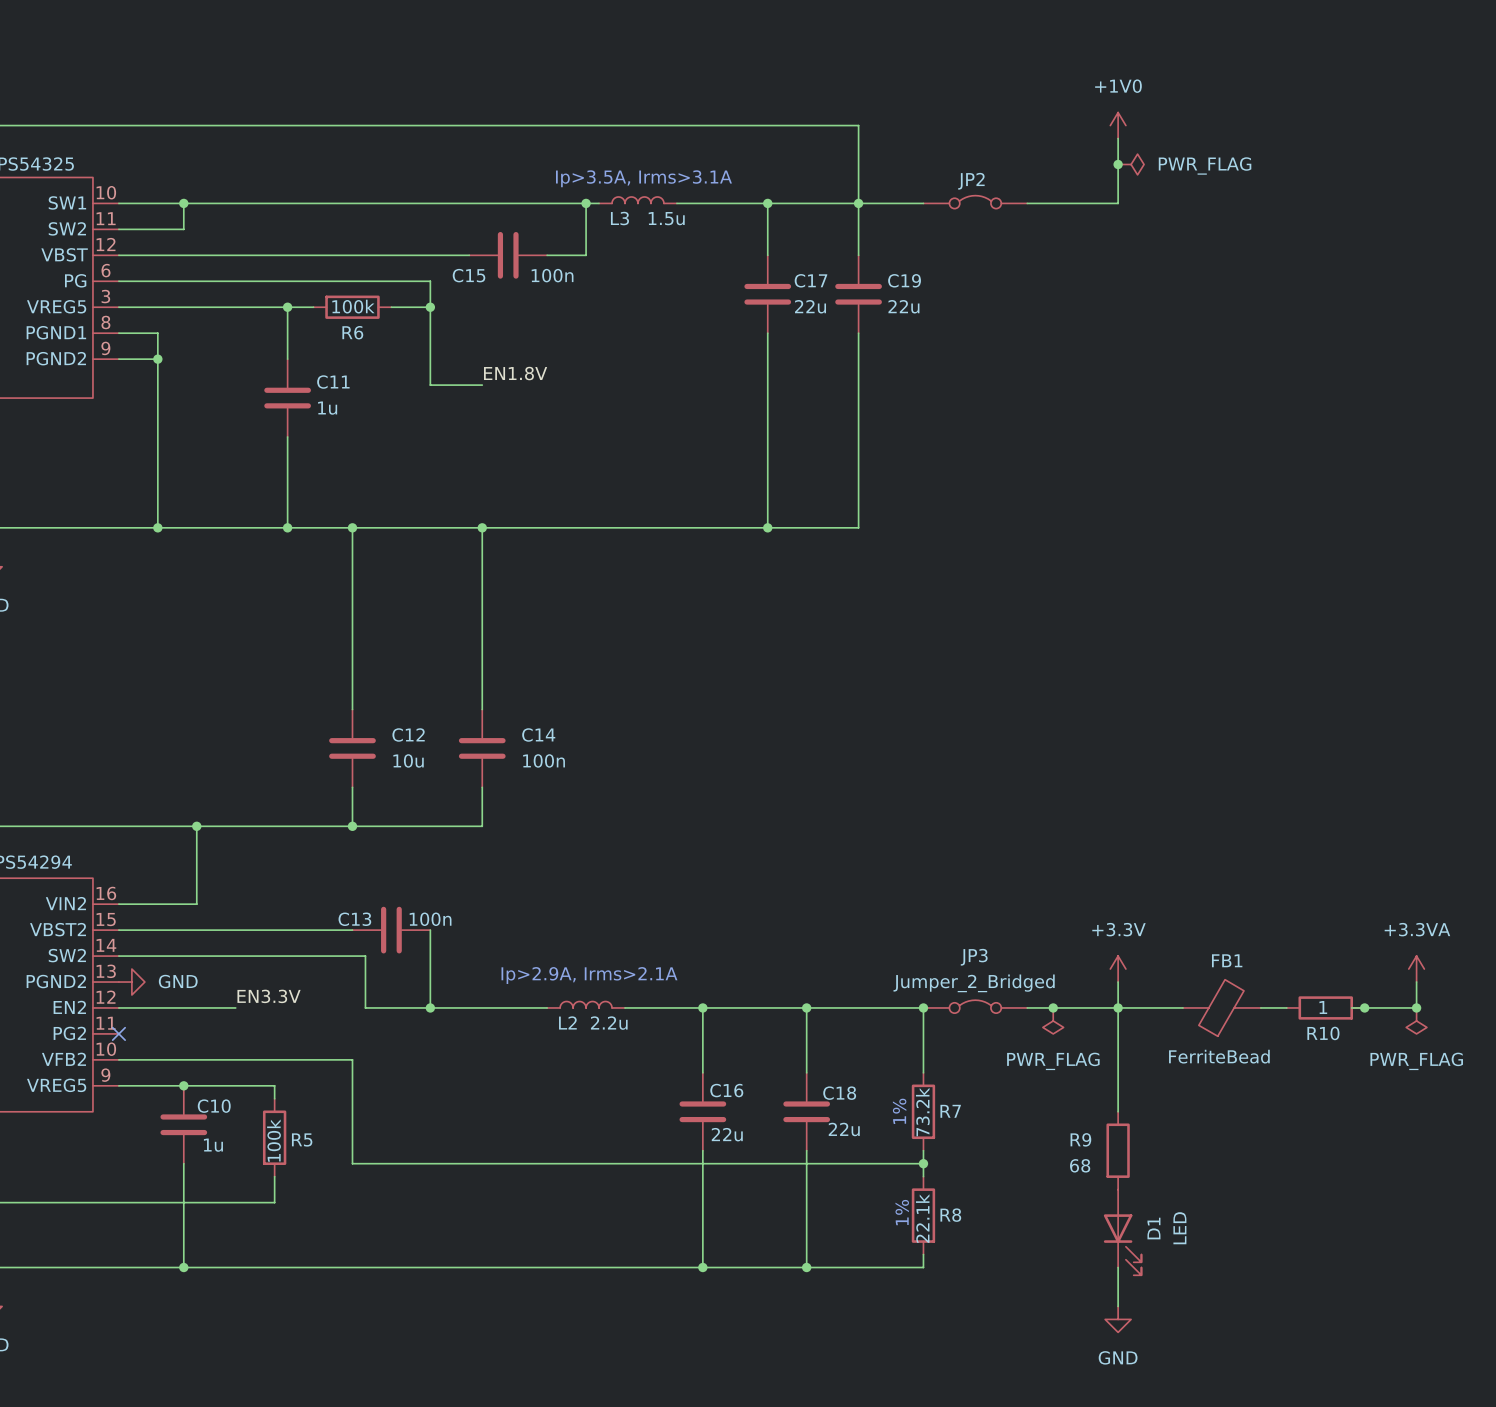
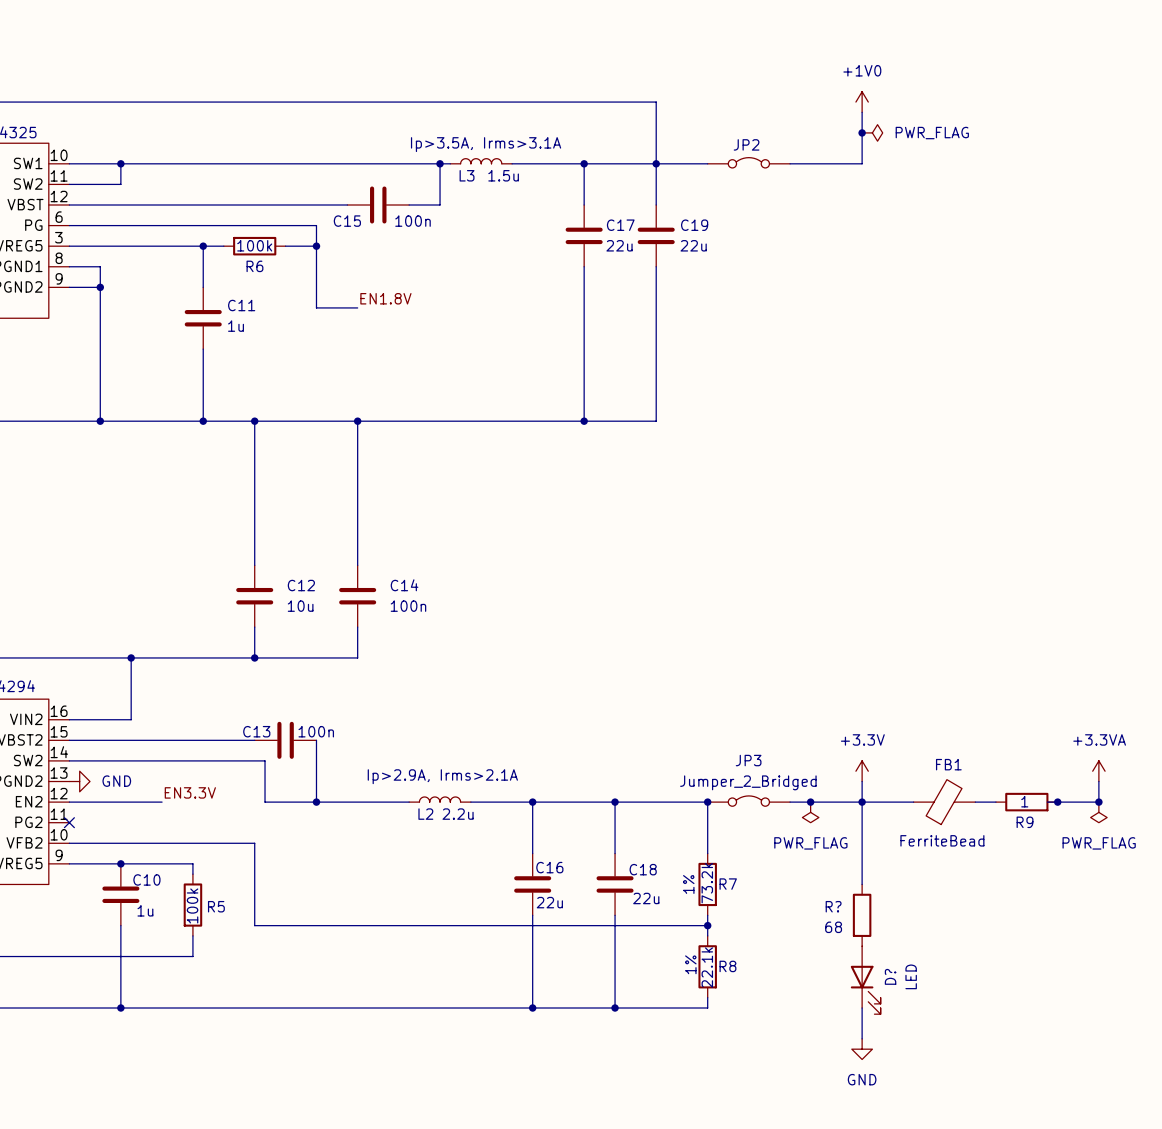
R10 name: R10 (1323, 1033) -> R9 (1025, 822)
R9 name: R9 (1080, 1139) -> R? (833, 906)
D1 name: D1 (1153, 1228) -> D? (890, 976)

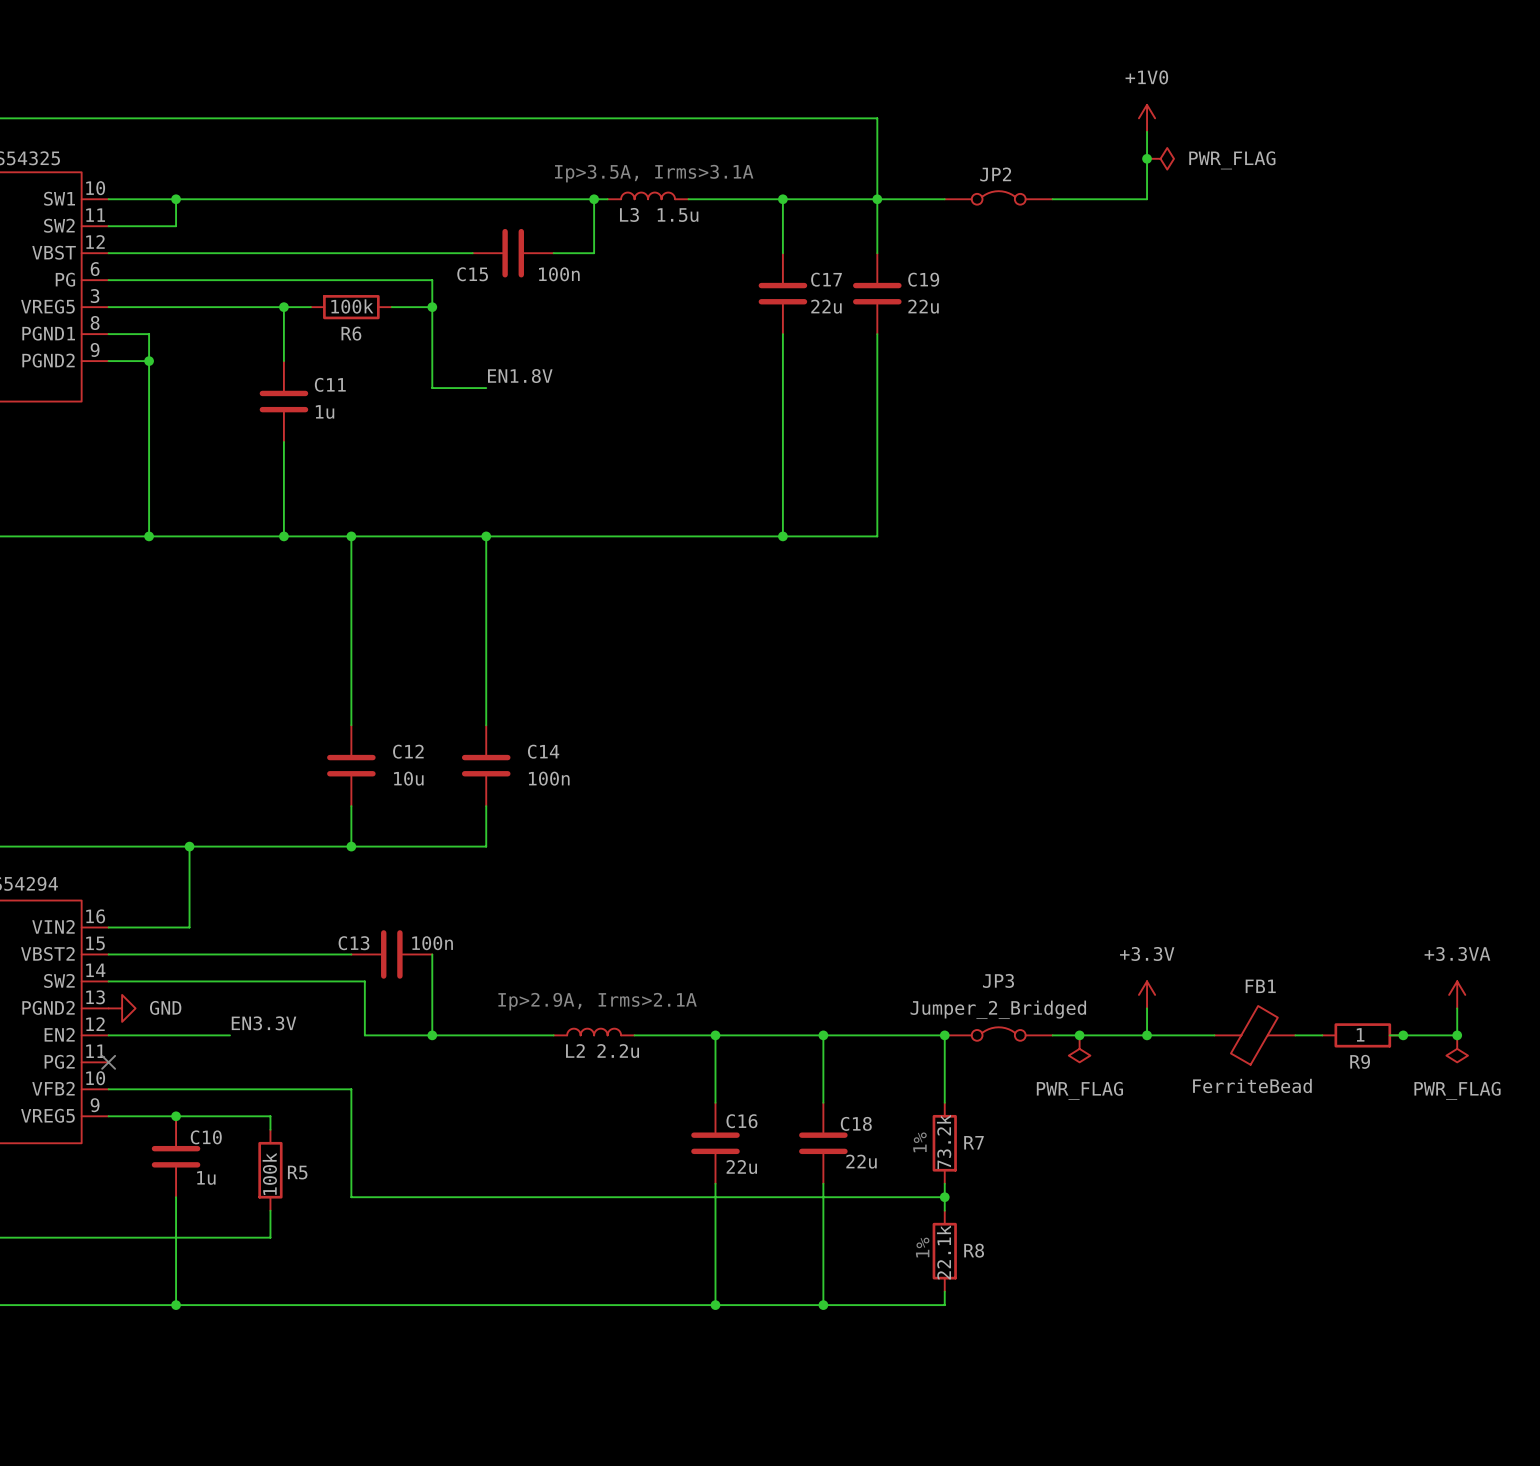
wire: (862, 802) (862, 884) -> none
R?: 68 (862, 915) -> none
D?: LED (865, 980) -> none
wire: (862, 1008) (862, 1038) -> none
power symbol: GND (862, 1049) -> none

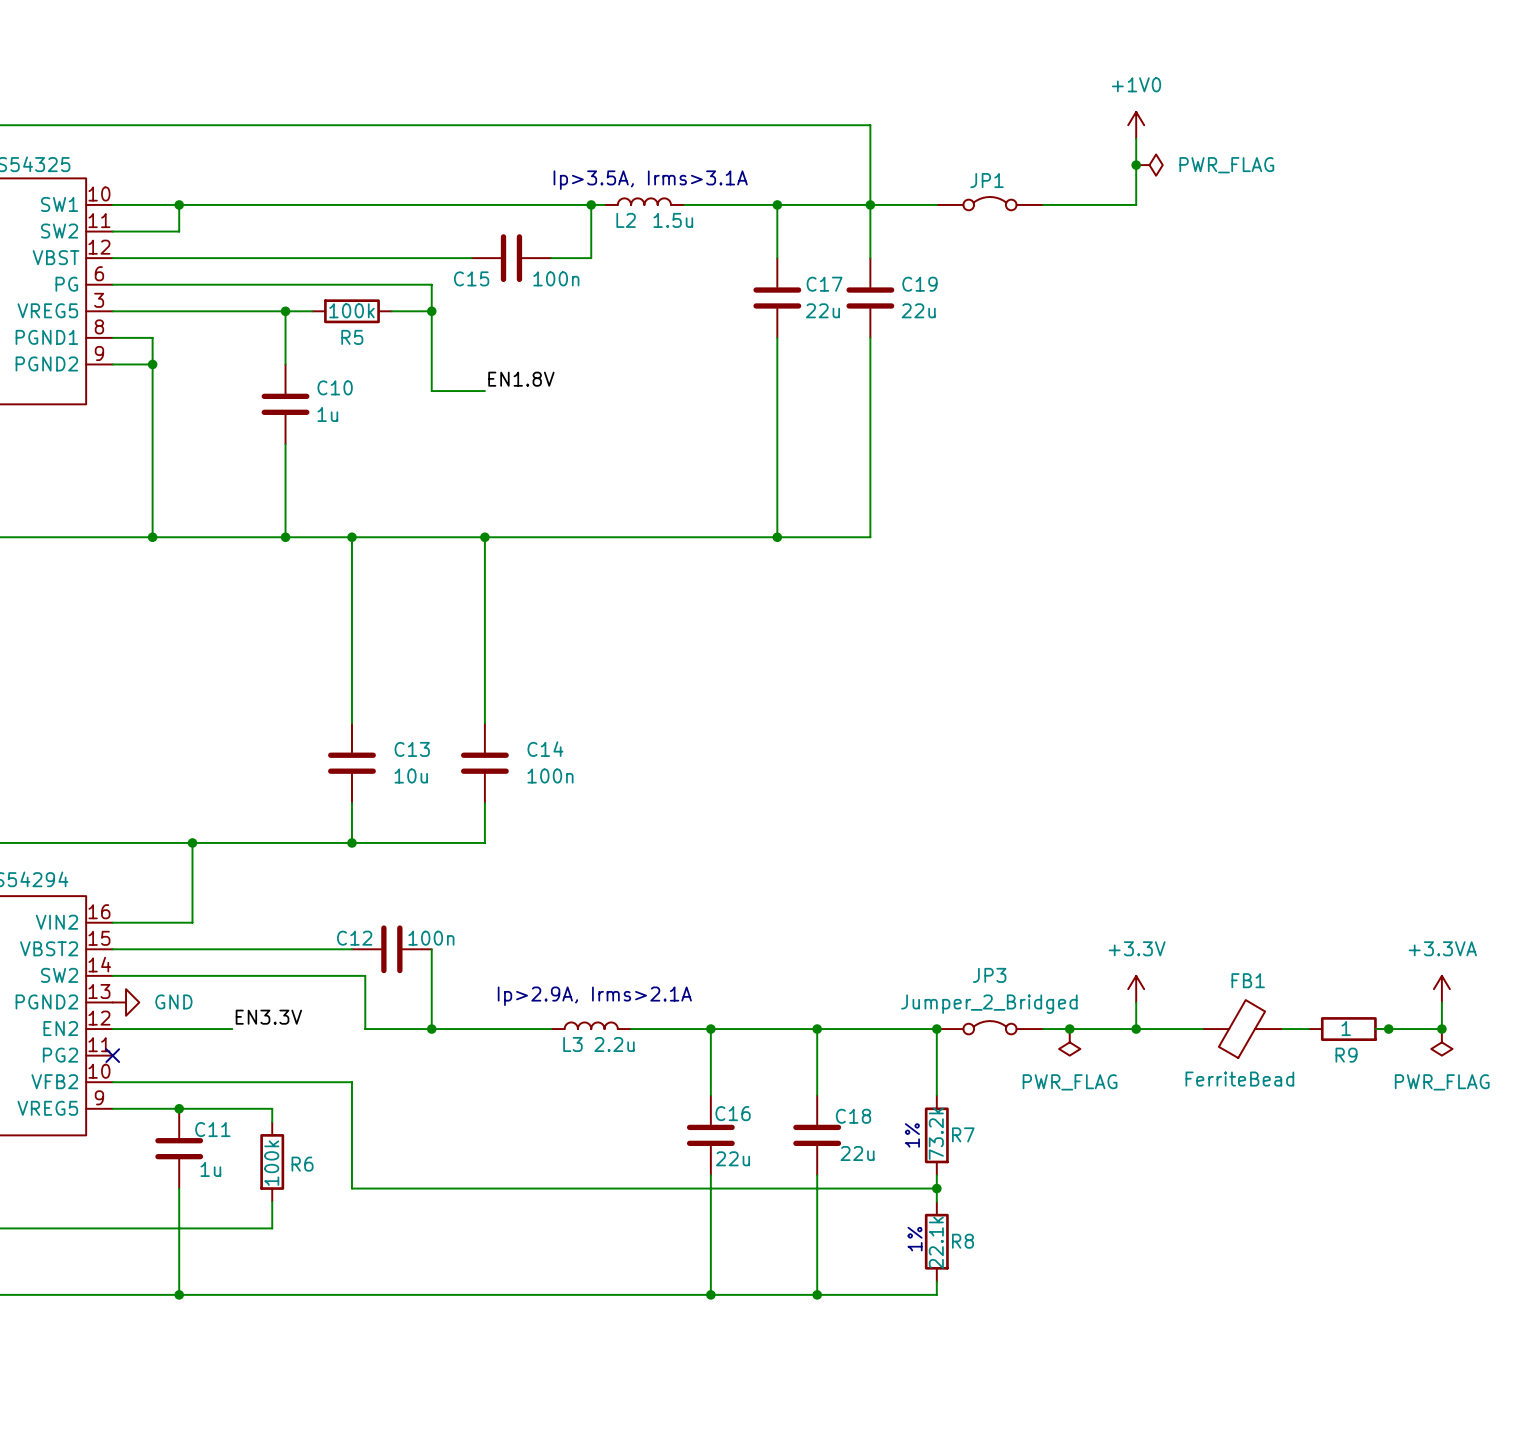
JP2 name: JP2 (995, 174) -> JP1 (987, 180)
L3 name: L3 (629, 214) -> L2 (626, 220)
R6 name: R6 (351, 333) -> R5 (352, 337)
C11 name: C11 (330, 384) -> C10 (335, 387)
C12 name: C12 (408, 751) -> C13 (412, 749)
C13 name: C13 (354, 943) -> C12 (354, 938)
L2 name: L2 (575, 1050) -> L3 (572, 1044)
C10 name: C10 (206, 1137) -> C11 (212, 1129)
R5 name: R5 (297, 1172) -> R6 (302, 1164)

